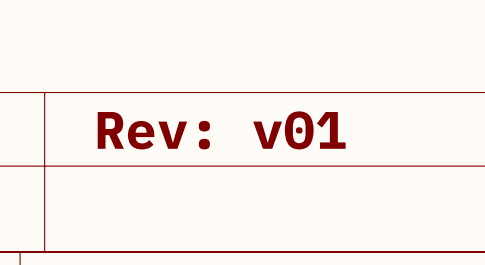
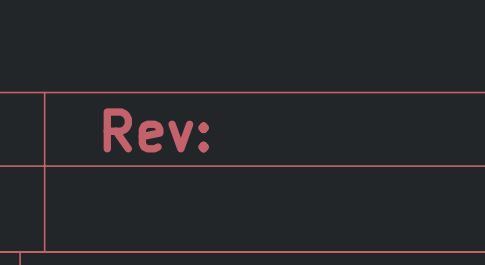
title block: Rev: v01 (221, 130) -> Rev: (156, 130)

